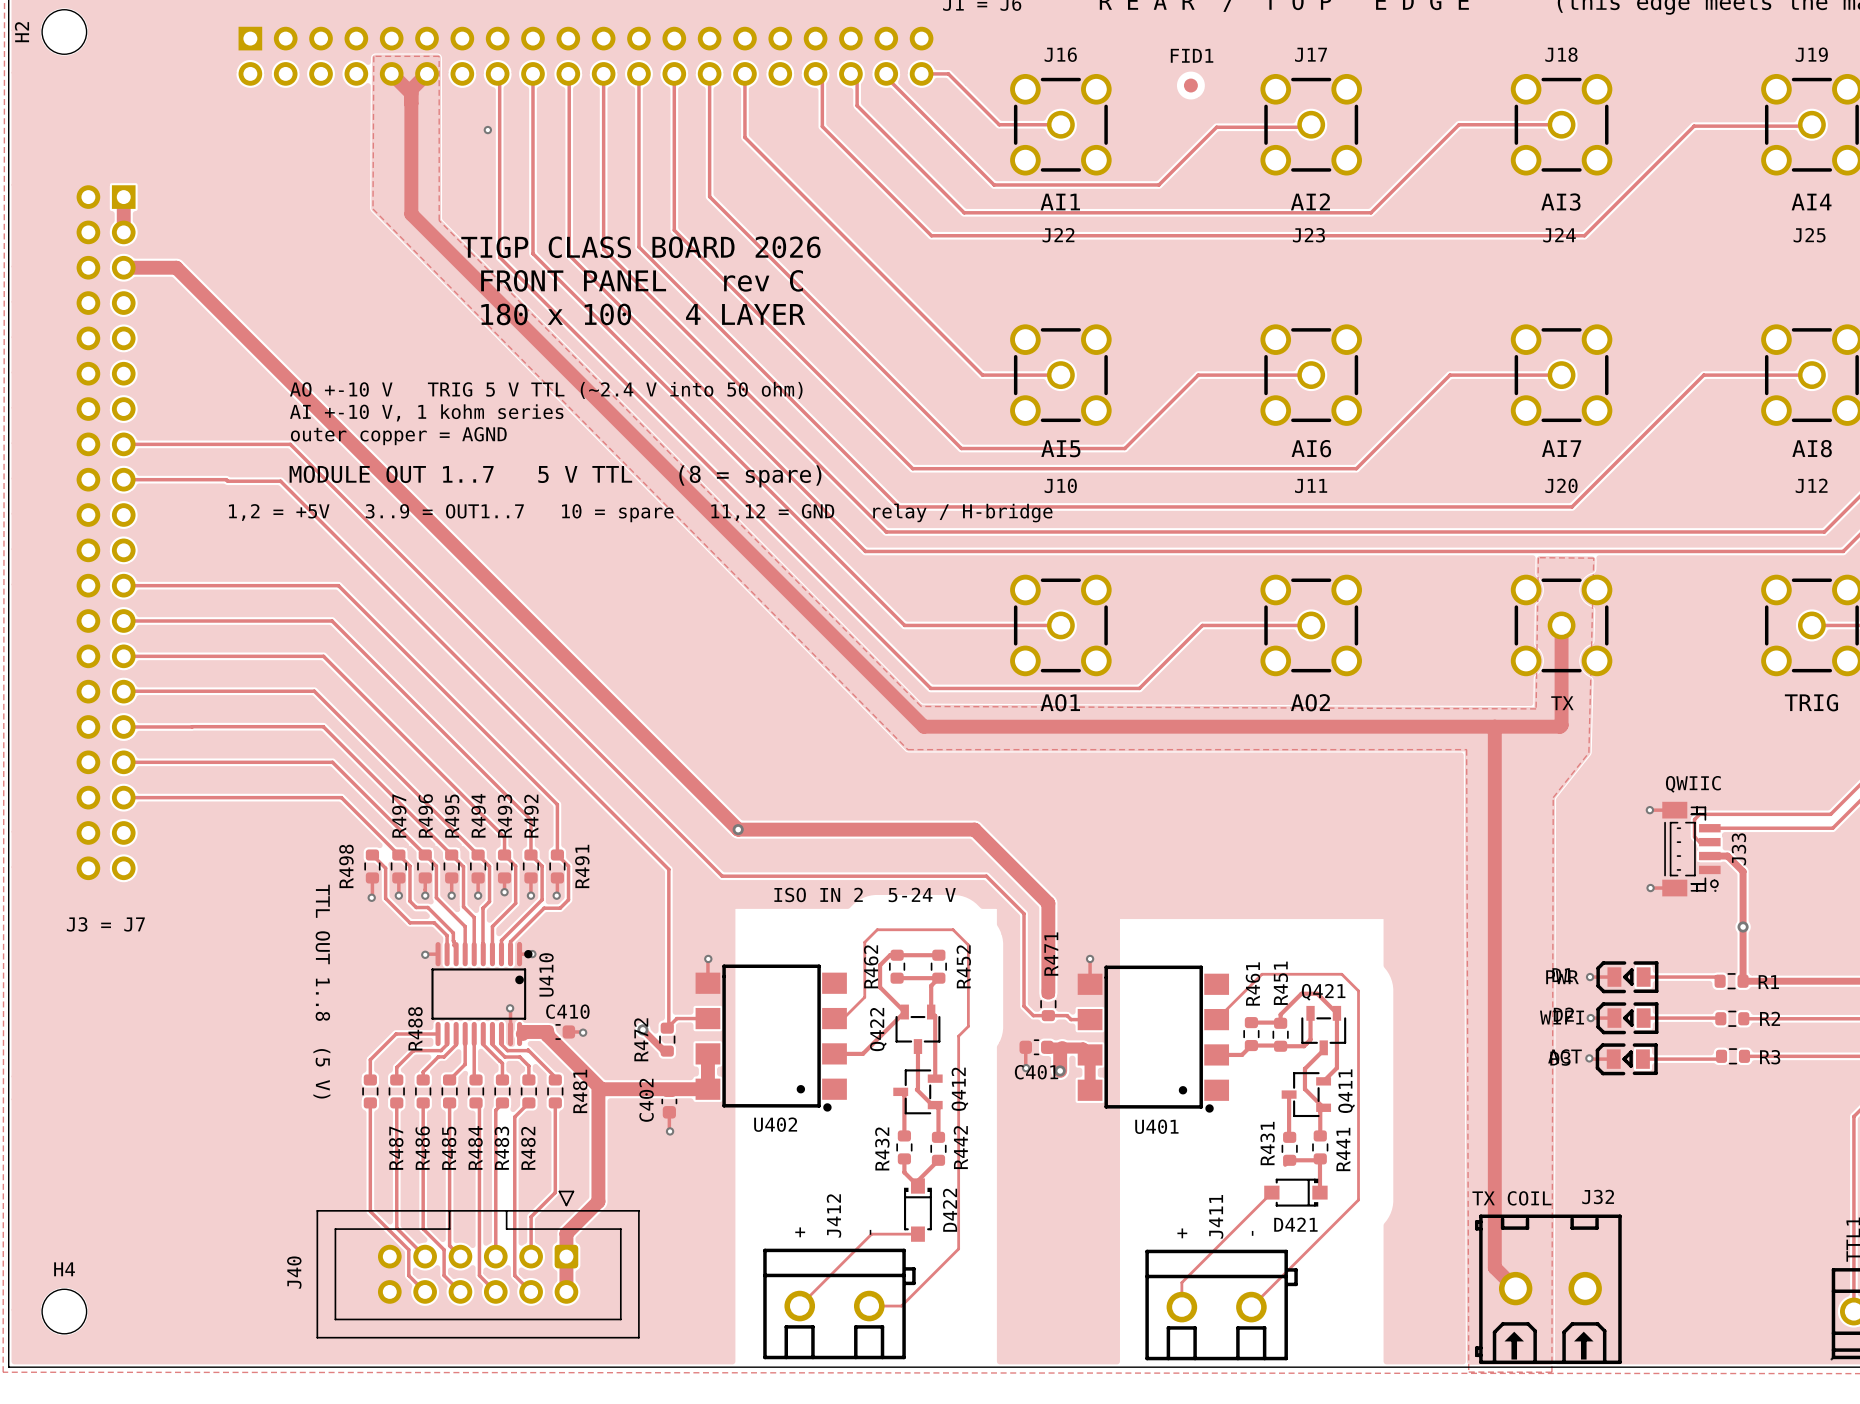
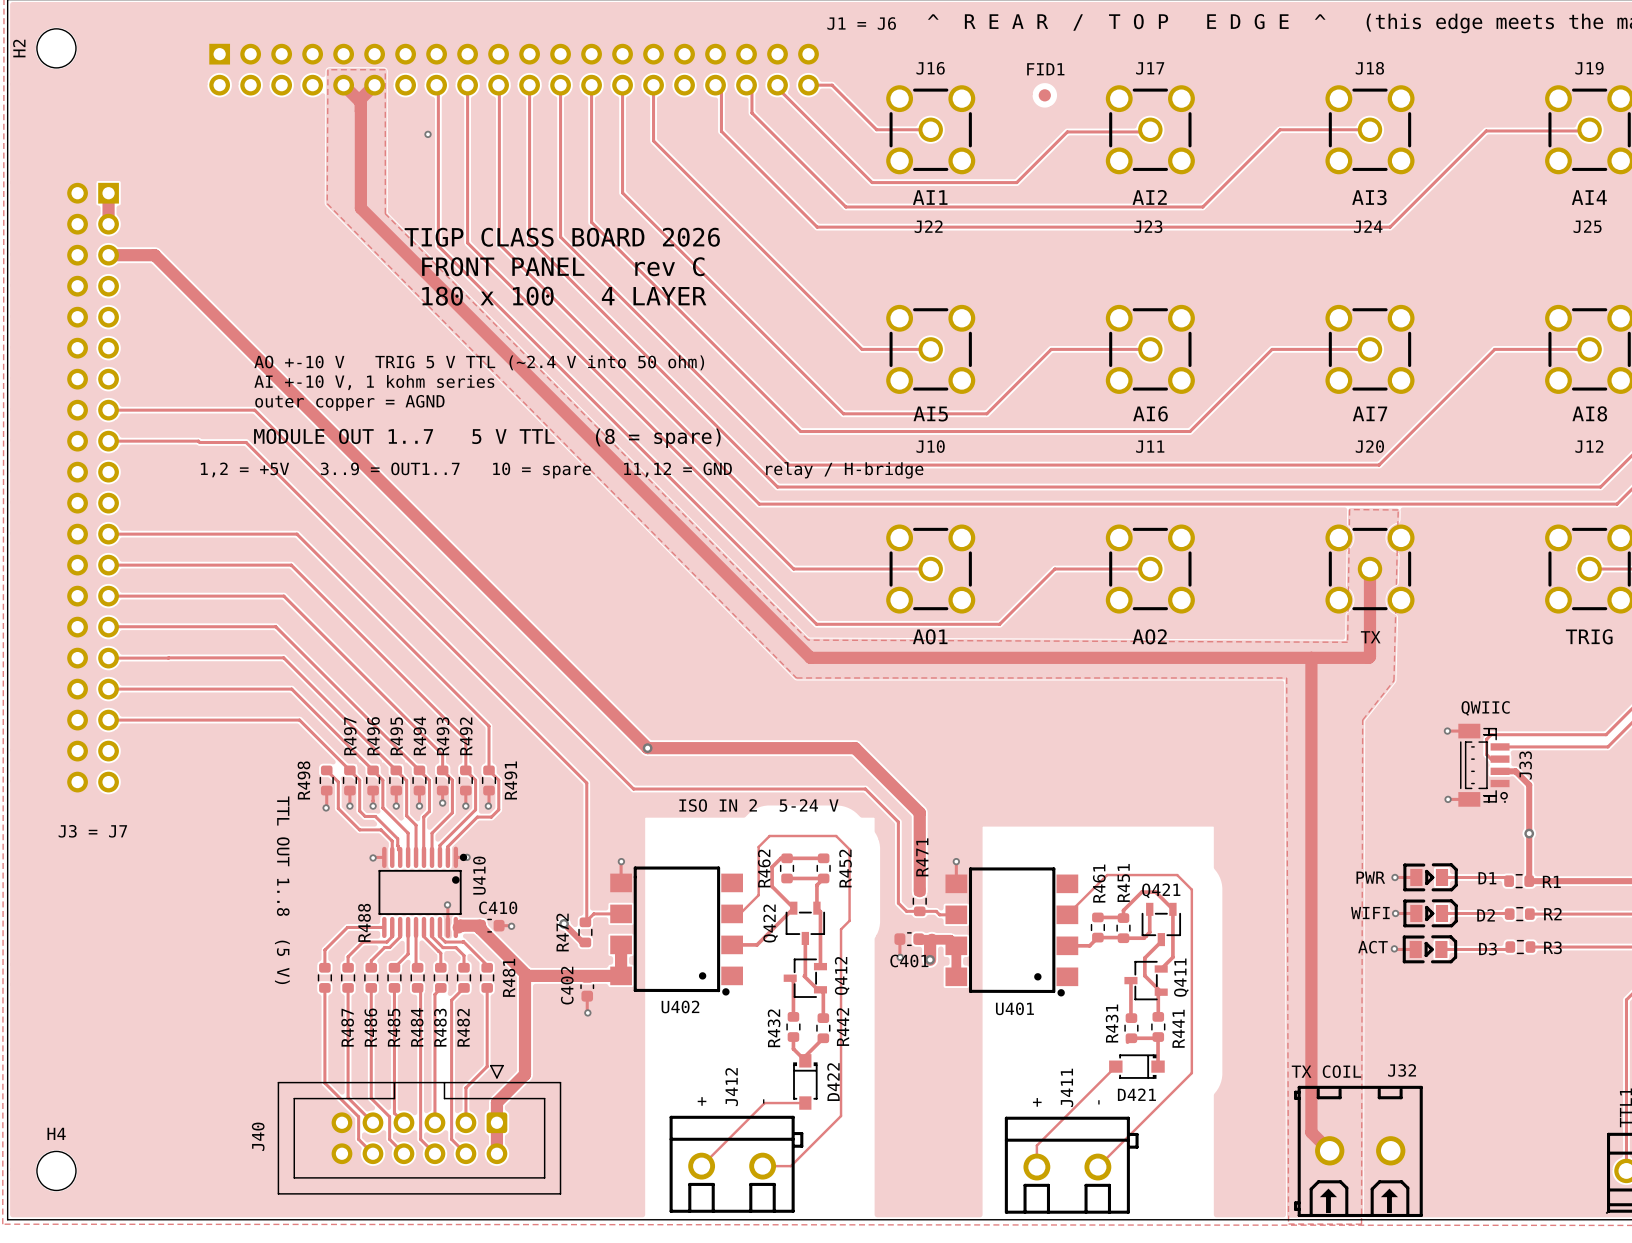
D1 rotation: 0° (1627, 977) -> 180° (1430, 877)
D2 rotation: 0° (1627, 1018) -> 180° (1430, 913)
D3 rotation: 0° (1626, 1059) -> 180° (1429, 949)

